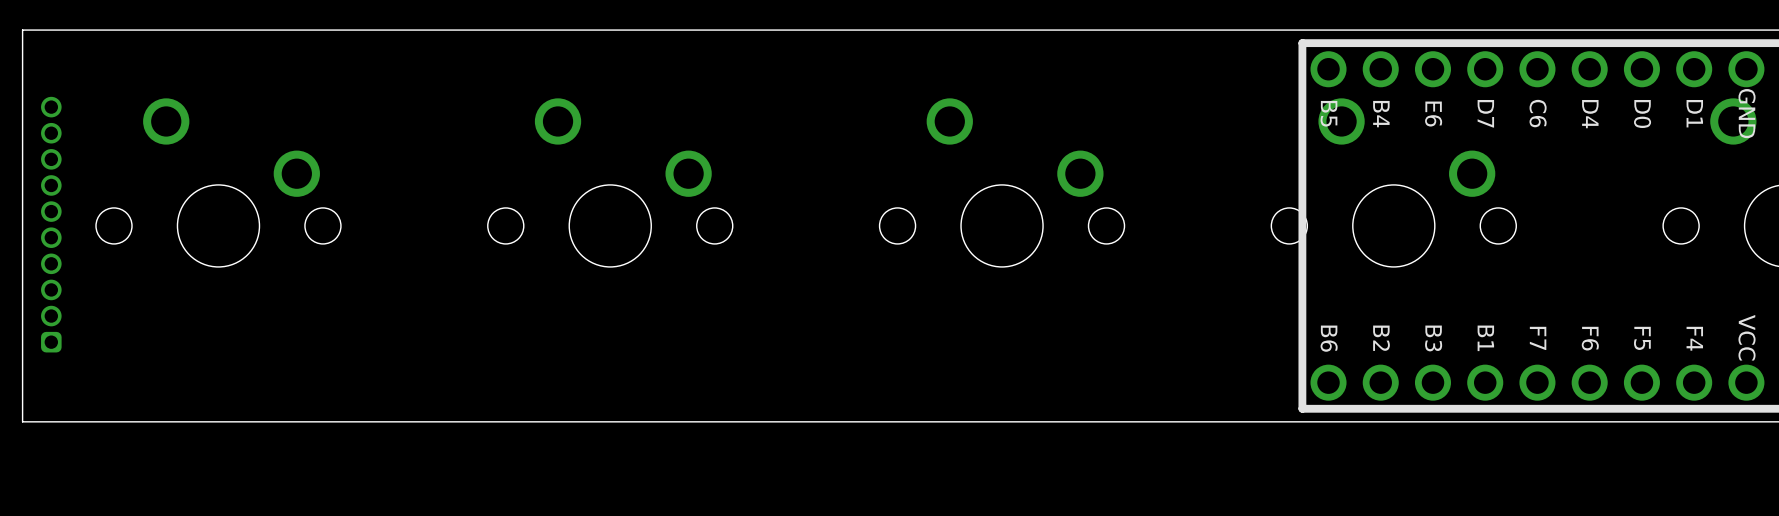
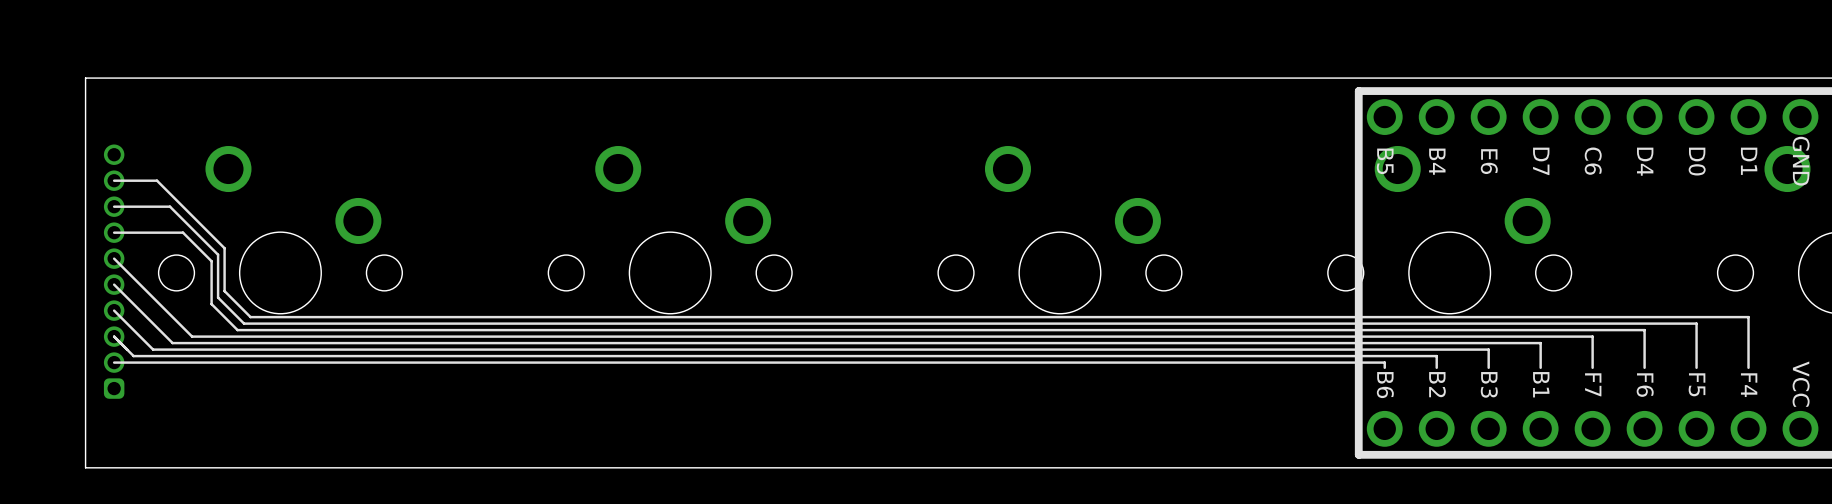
line: none -> (114, 180) (157, 180) (224, 248) (224, 291) (250, 317) (1748, 317) (1748, 367)
line: none -> (114, 206) (170, 206) (218, 254) (218, 297) (244, 323) (1696, 323) (1696, 367)
line: none -> (114, 232) (183, 232) (211, 261) (211, 304) (237, 330) (1644, 330) (1644, 367)
line: none -> (114, 258) (192, 336) (1592, 336) (1592, 367)
line: none -> (114, 284) (172, 343) (1540, 343) (1540, 367)
line: none -> (114, 310) (153, 349) (1488, 349) (1488, 367)
line: none -> (114, 336) (133, 356) (1436, 356) (1436, 367)
line: none -> (114, 362) (1384, 362) (1384, 367)

